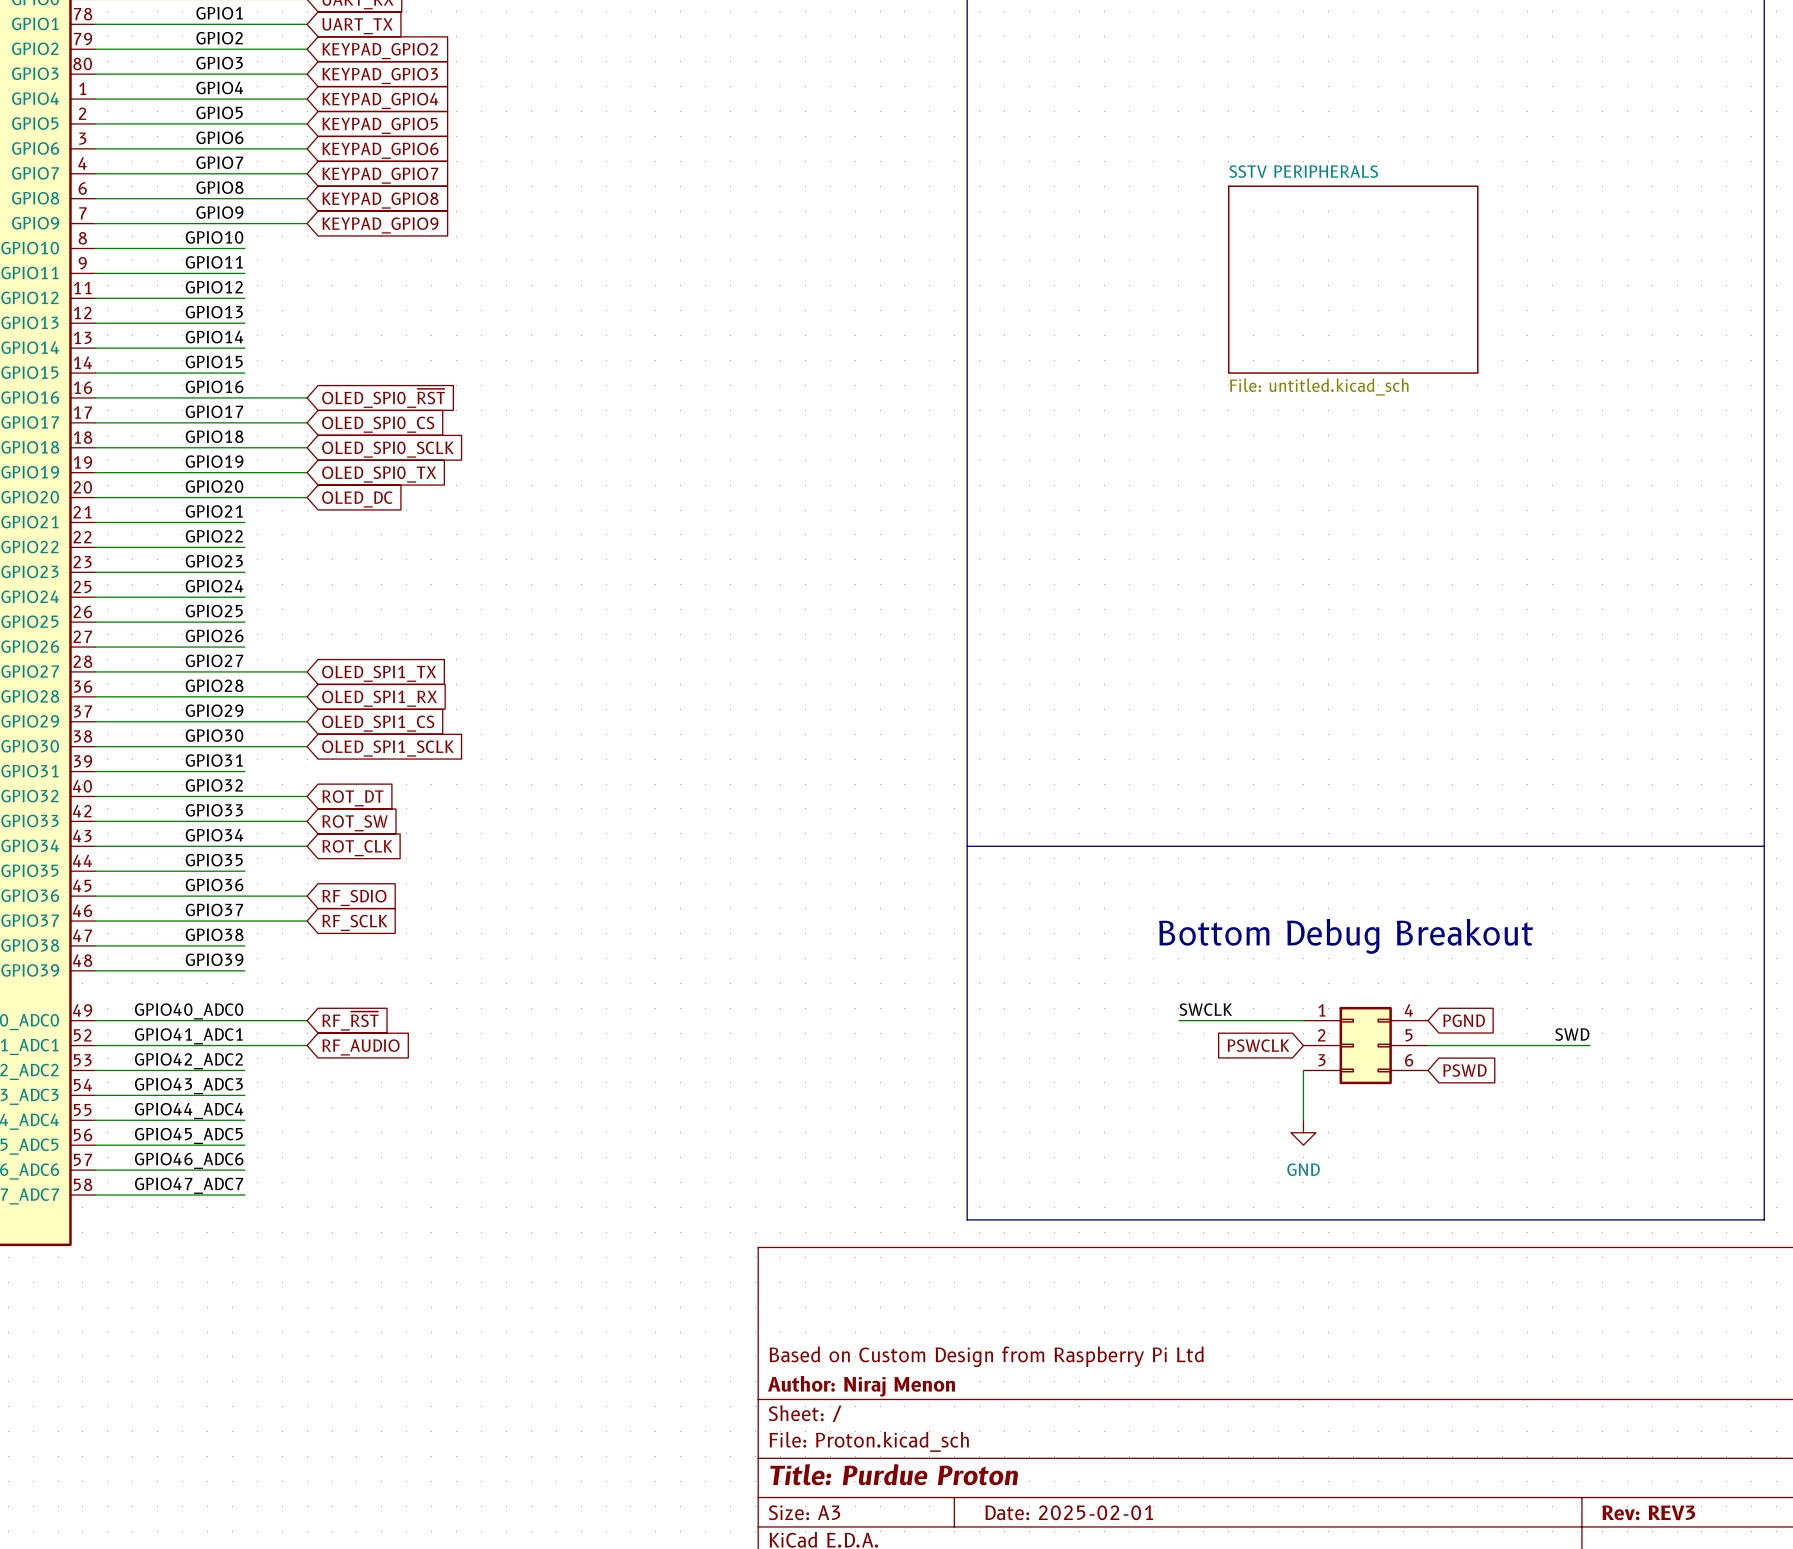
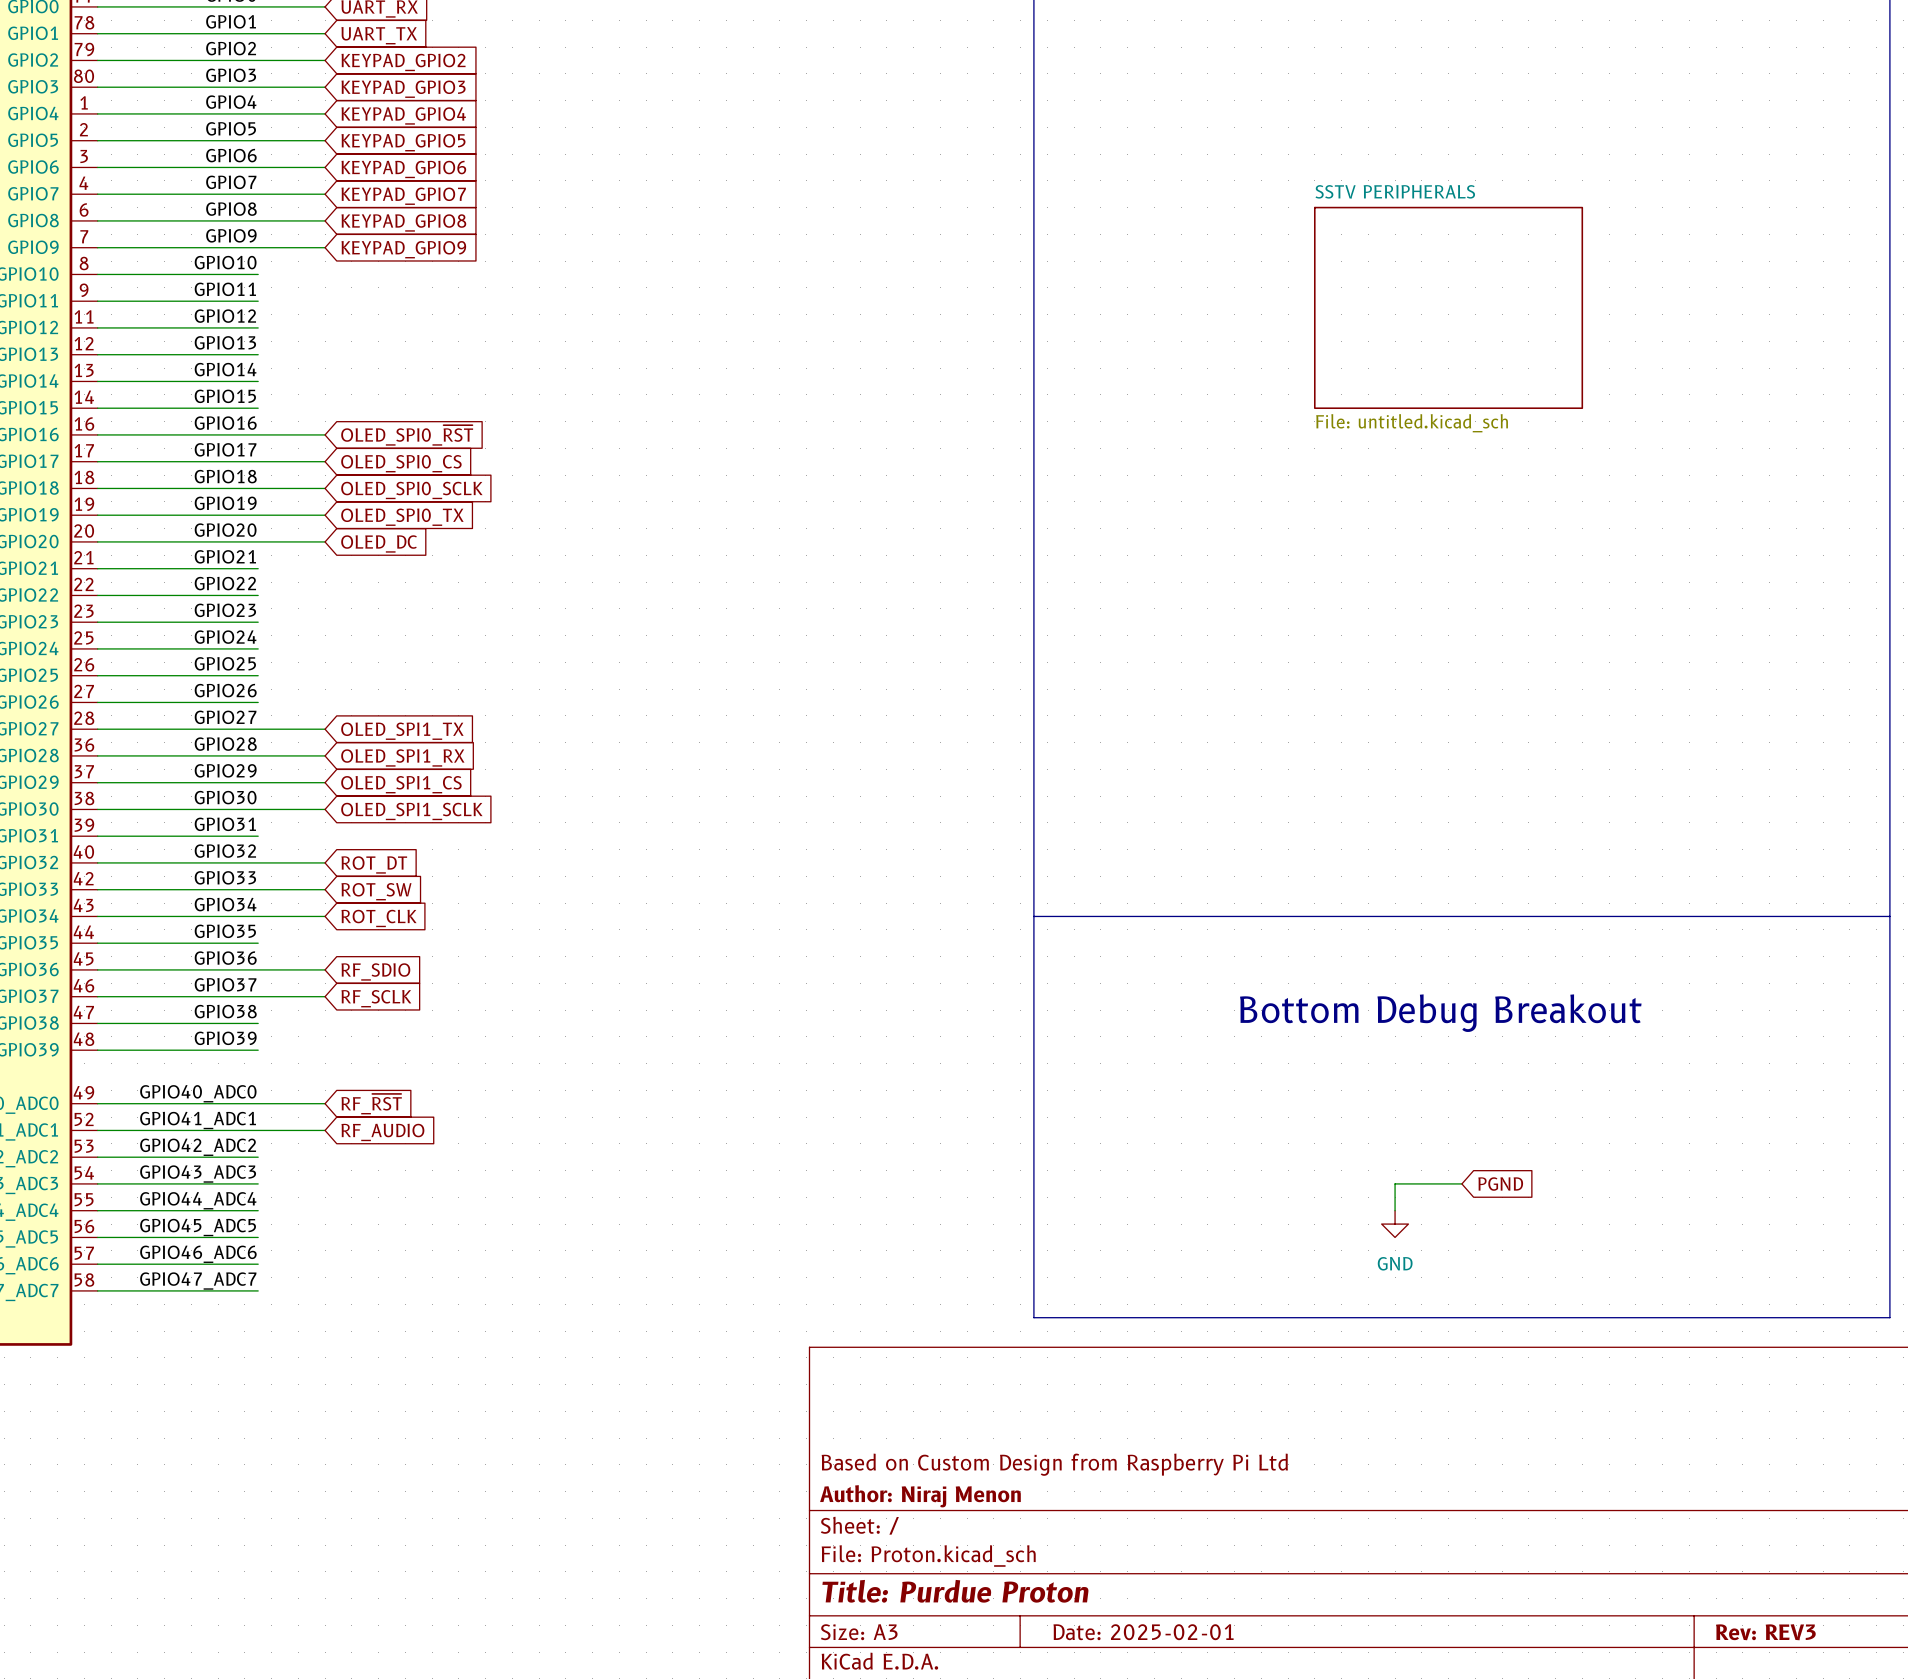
label: SWCLK (1205, 1009) -> none
wire: (1178, 1020) (1303, 1020) -> none
global label position: PGND (1464, 1020) -> PGND (1500, 1184)
label: SWD (1572, 1034) -> none
global label: PSWCLK (1258, 1045) -> none
part: (1365, 1045) -> none
wire: (1427, 1045) (1589, 1045) -> none
wire: (1303, 1070) (1303, 1095) -> (1461, 1183) (1395, 1183)
global label: PSWD (1464, 1070) -> none

